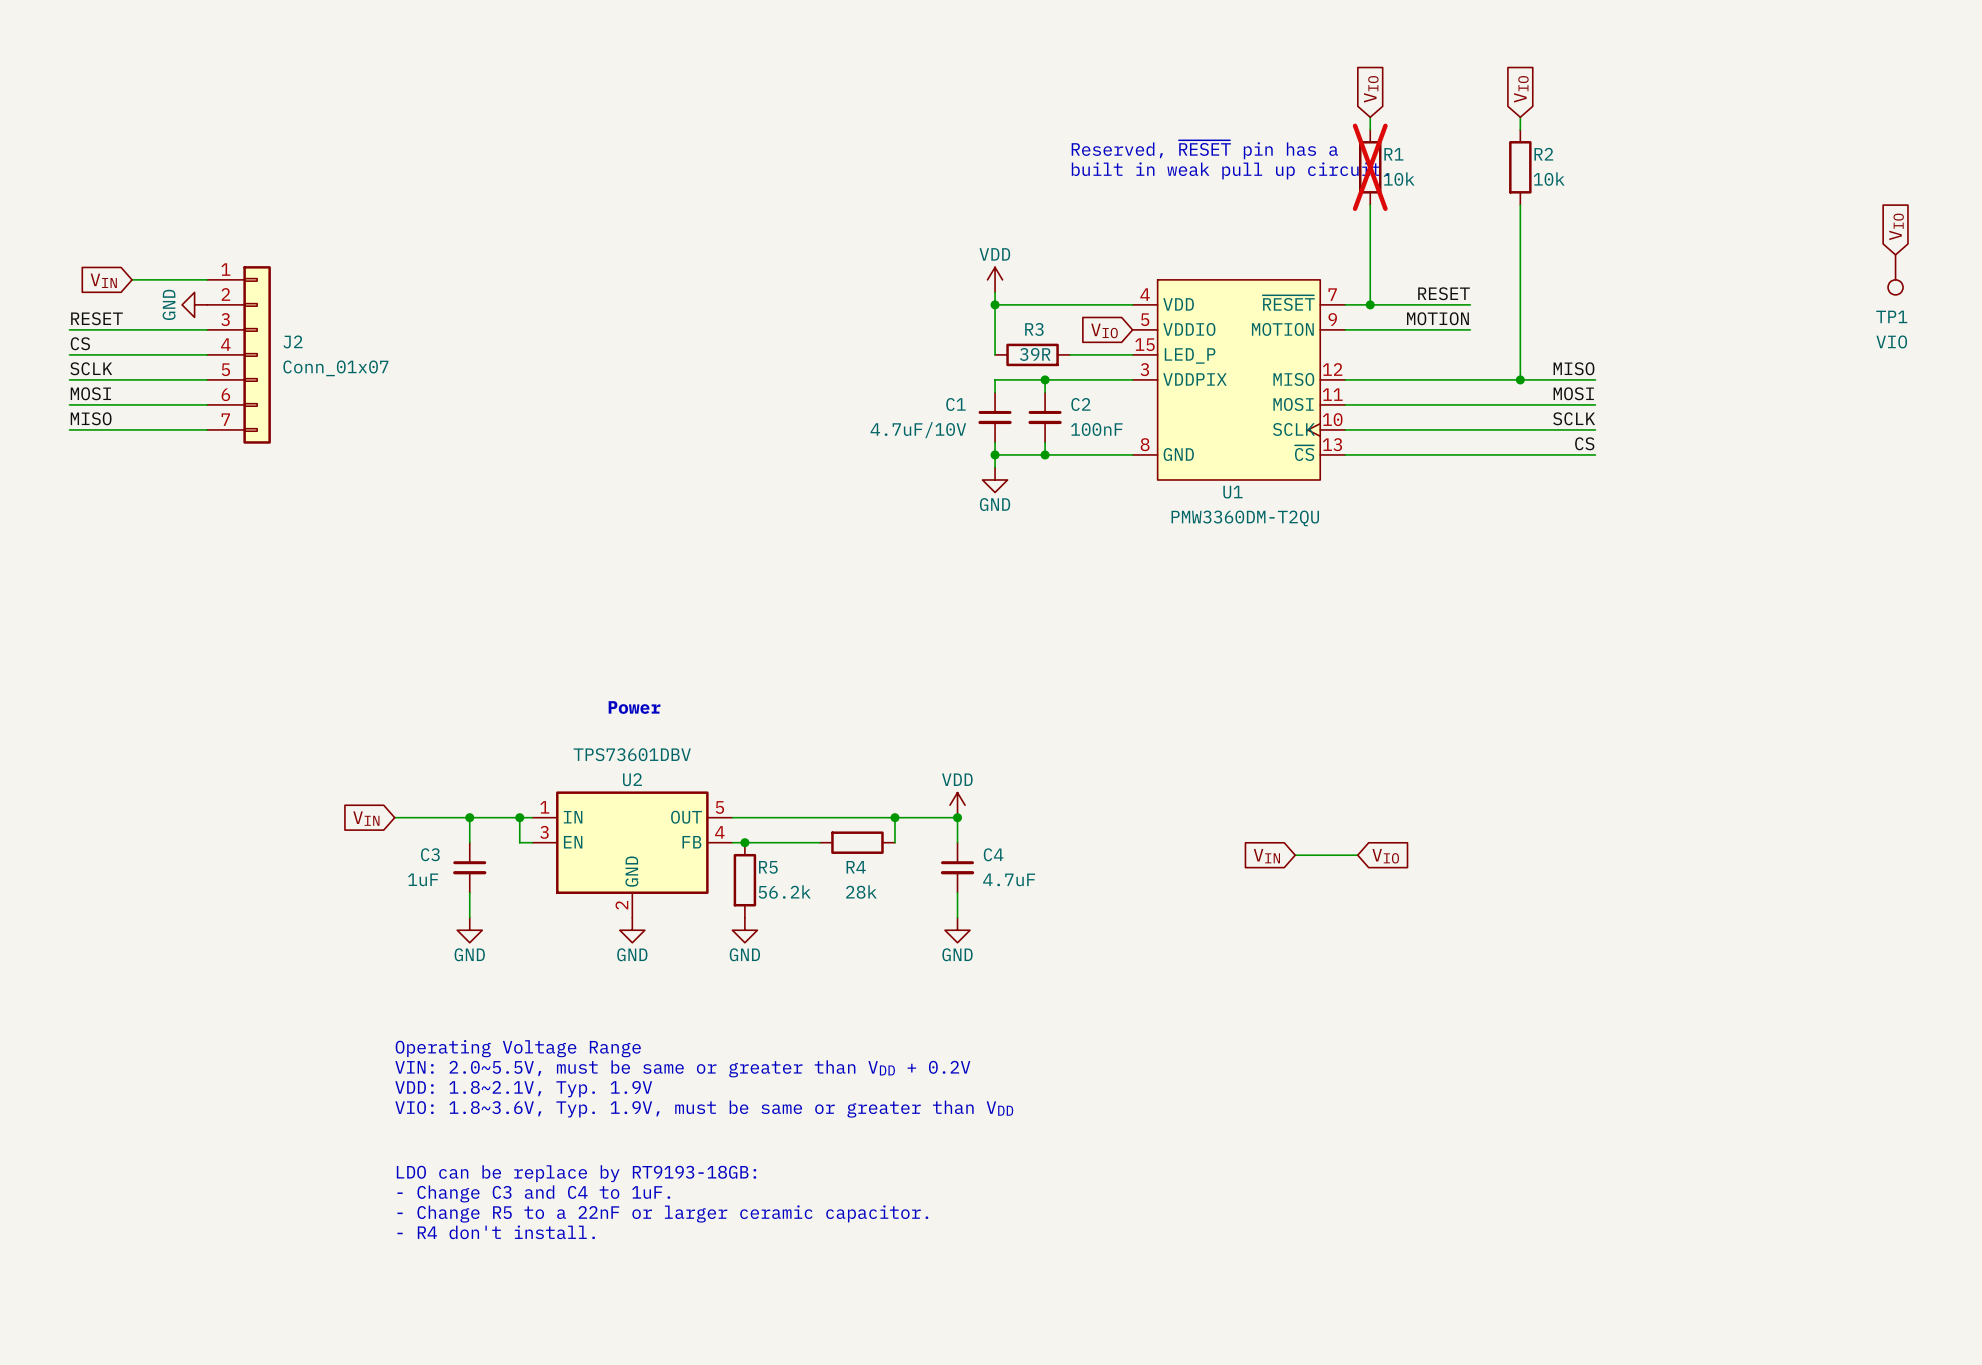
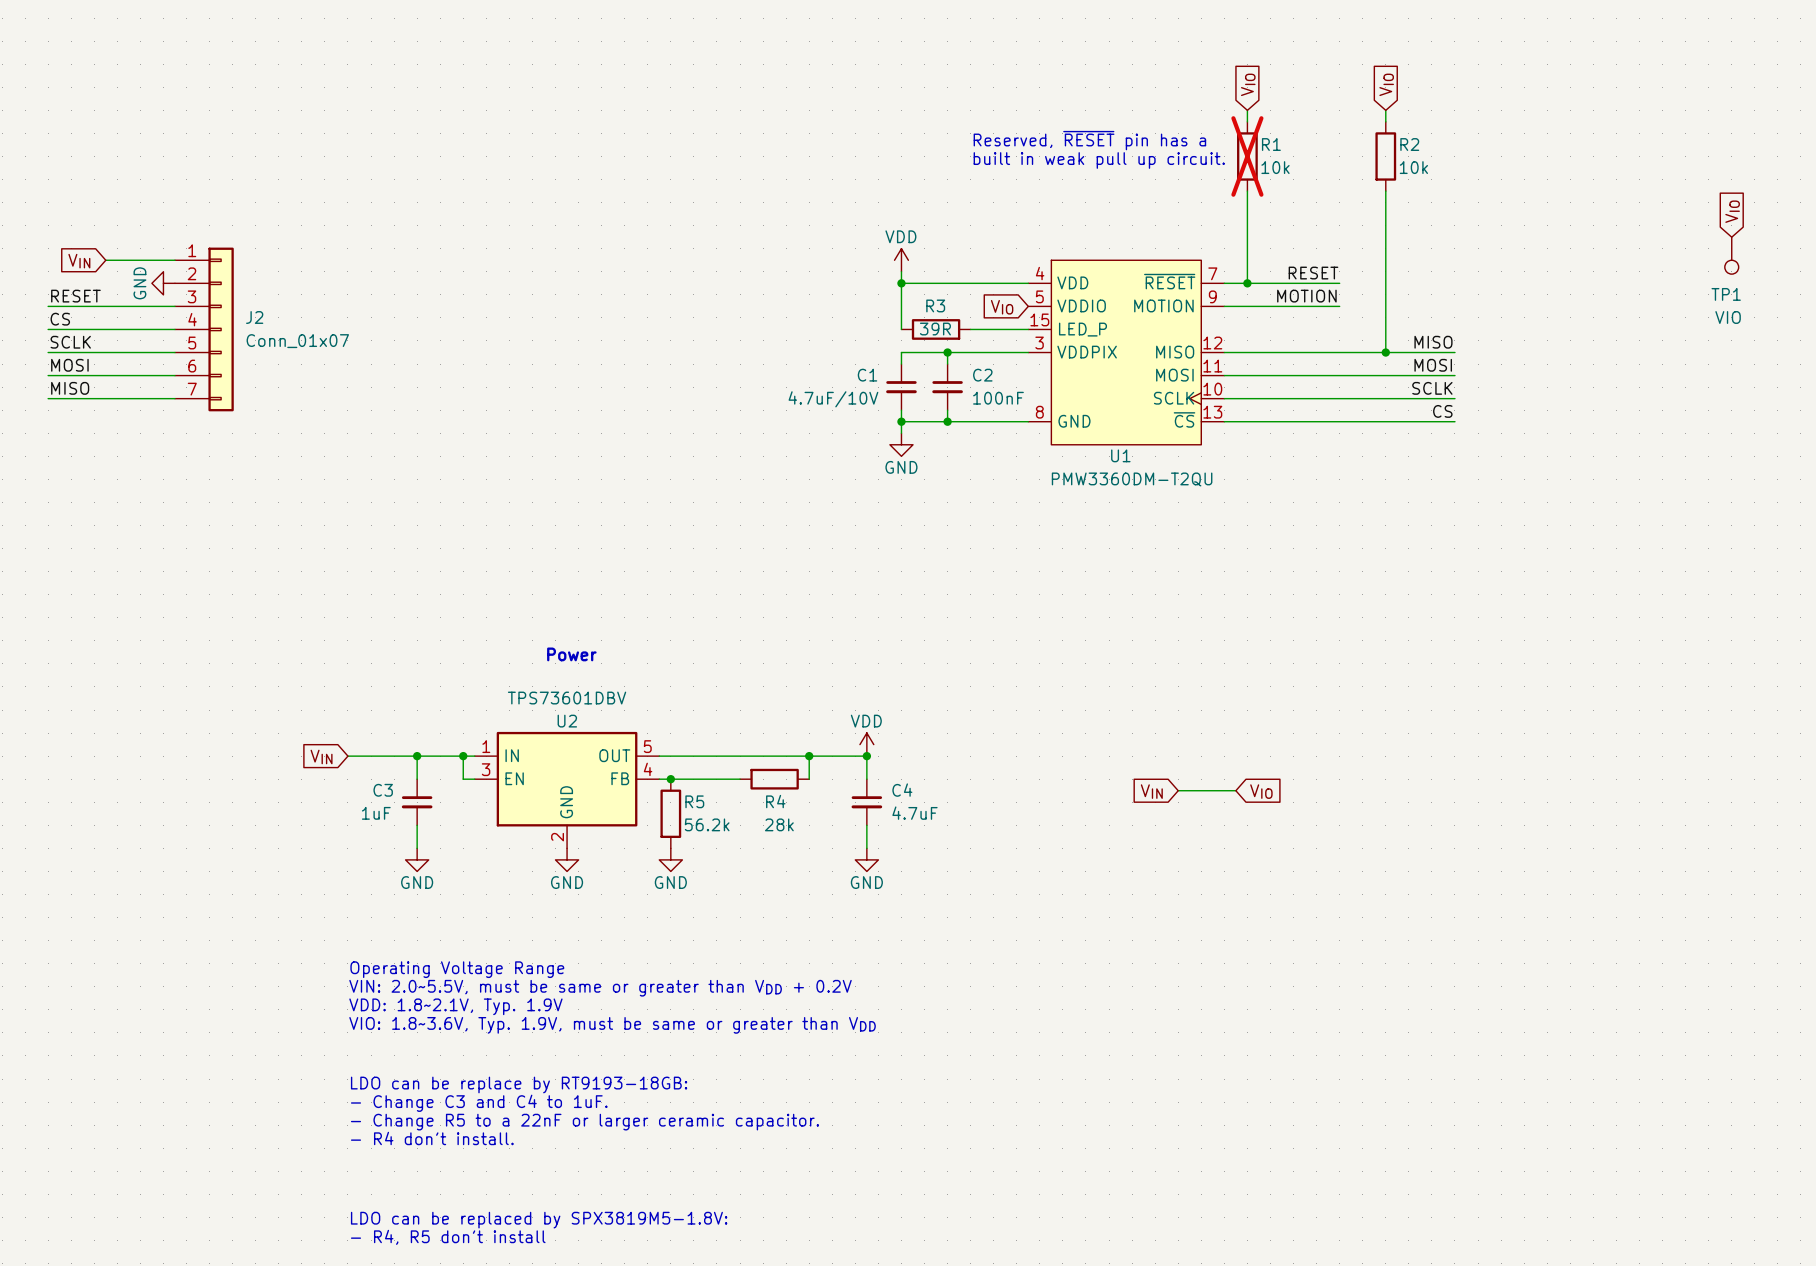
text: none -> LDO can be replaced by SPX3819M5-1.8V: (539, 1220)
text: none -> - R4, R5 don't install (448, 1237)

